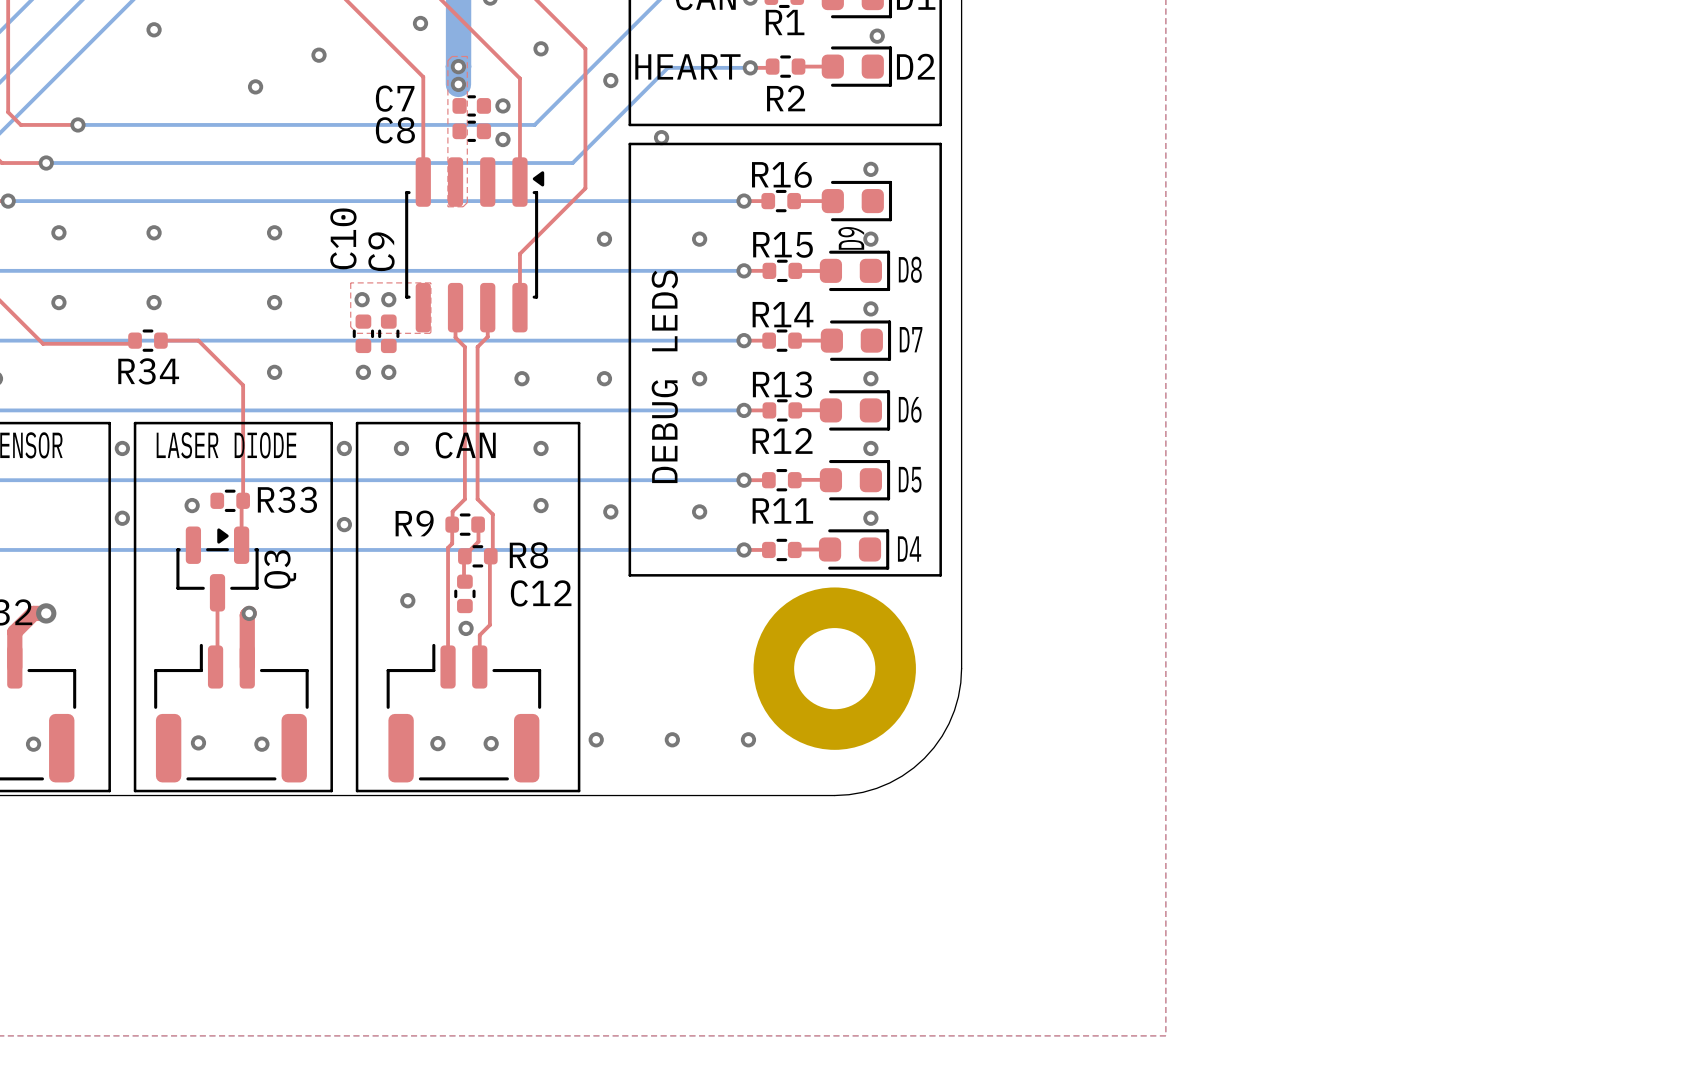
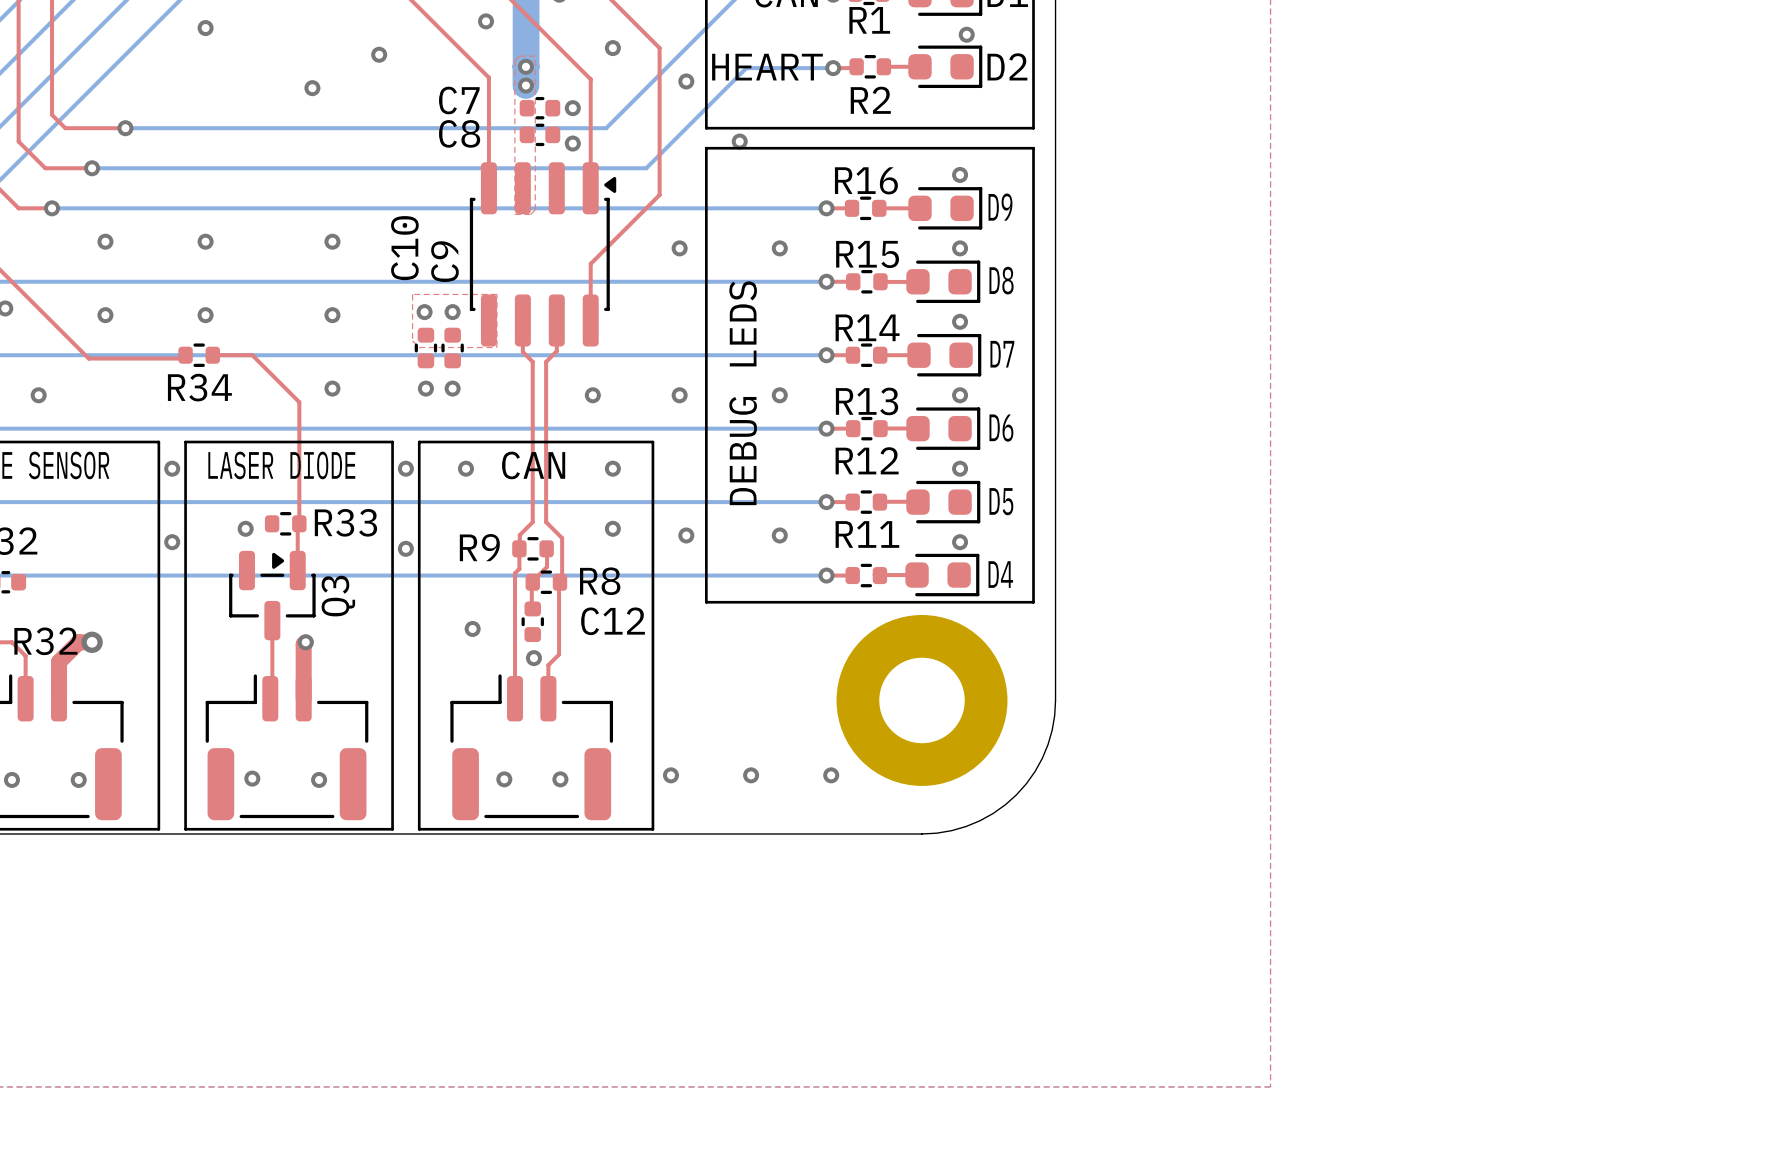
D9 name rotation: 0° (851, 238) -> 90° clockwise (1000, 207)
D9 name position: D9 (851, 238) -> D9 (1000, 207)

